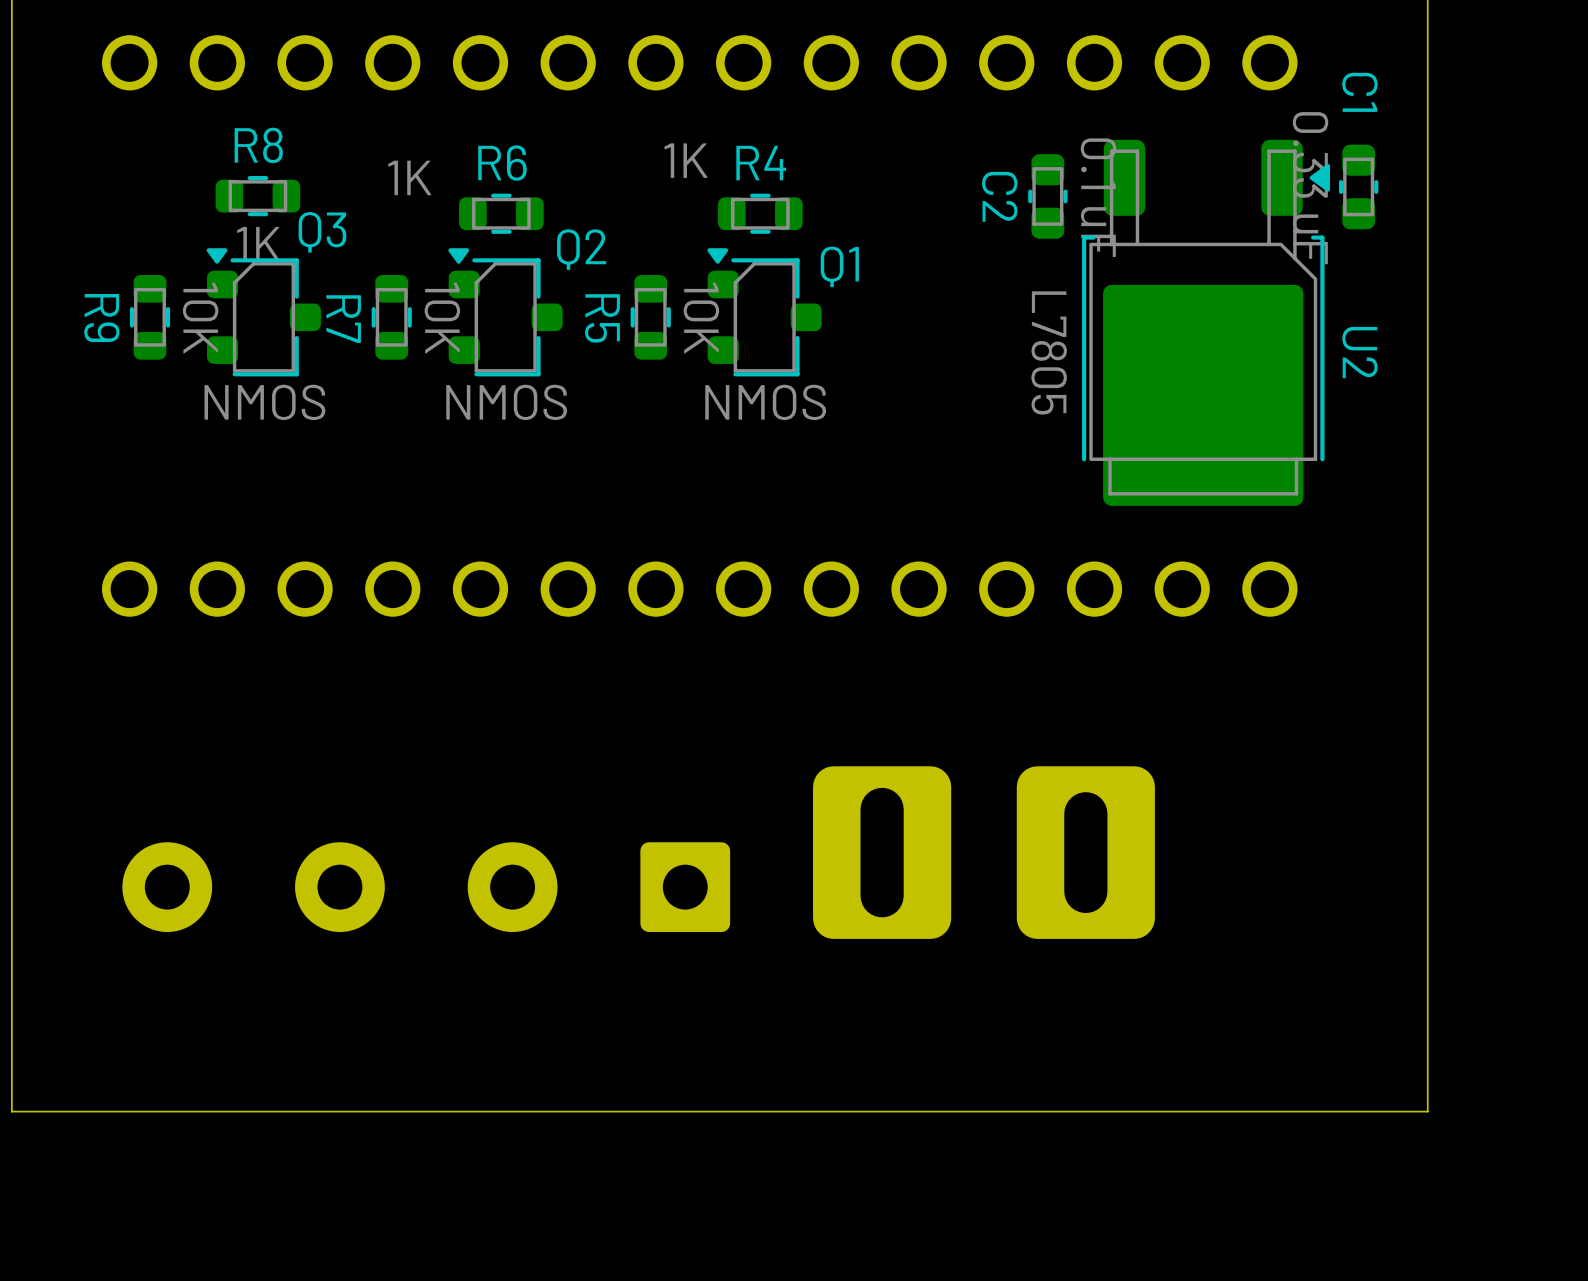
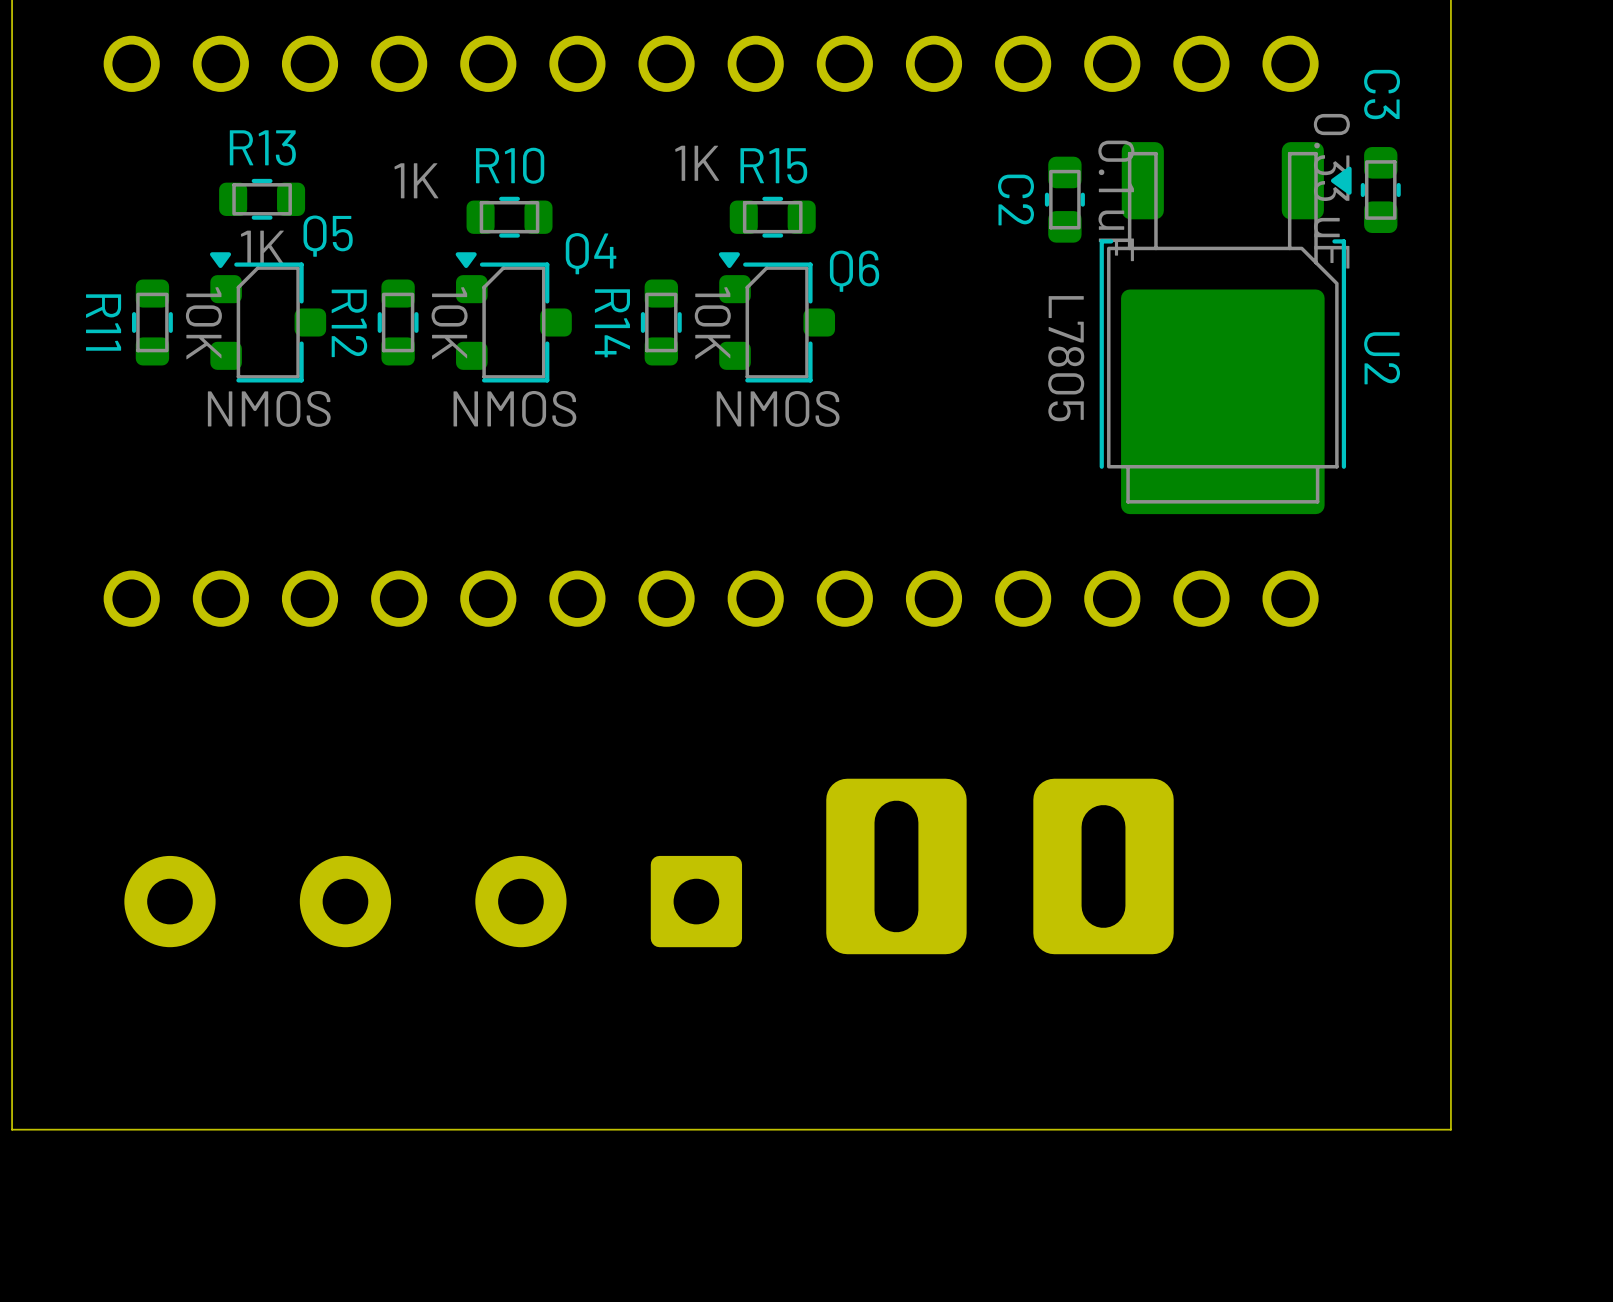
C1 name: C1 (1359, 92) -> C3 (1382, 94)
R8 name: R8 (258, 145) -> R13 (262, 148)
R6 name: R6 (502, 163) -> R10 (510, 165)
R4 name: R4 (761, 163) -> R15 (773, 165)
Q3 name: Q3 (322, 232) -> Q5 (328, 236)
Q2 name: Q2 (581, 249) -> Q4 (591, 253)
Q1 name: Q1 (839, 266) -> Q6 (854, 271)
R9 name: R9 (101, 318) -> R11 (103, 322)
R5 name: R5 (602, 318) -> R14 (612, 323)
R7 name: R7 (343, 319) -> R12 (349, 323)

